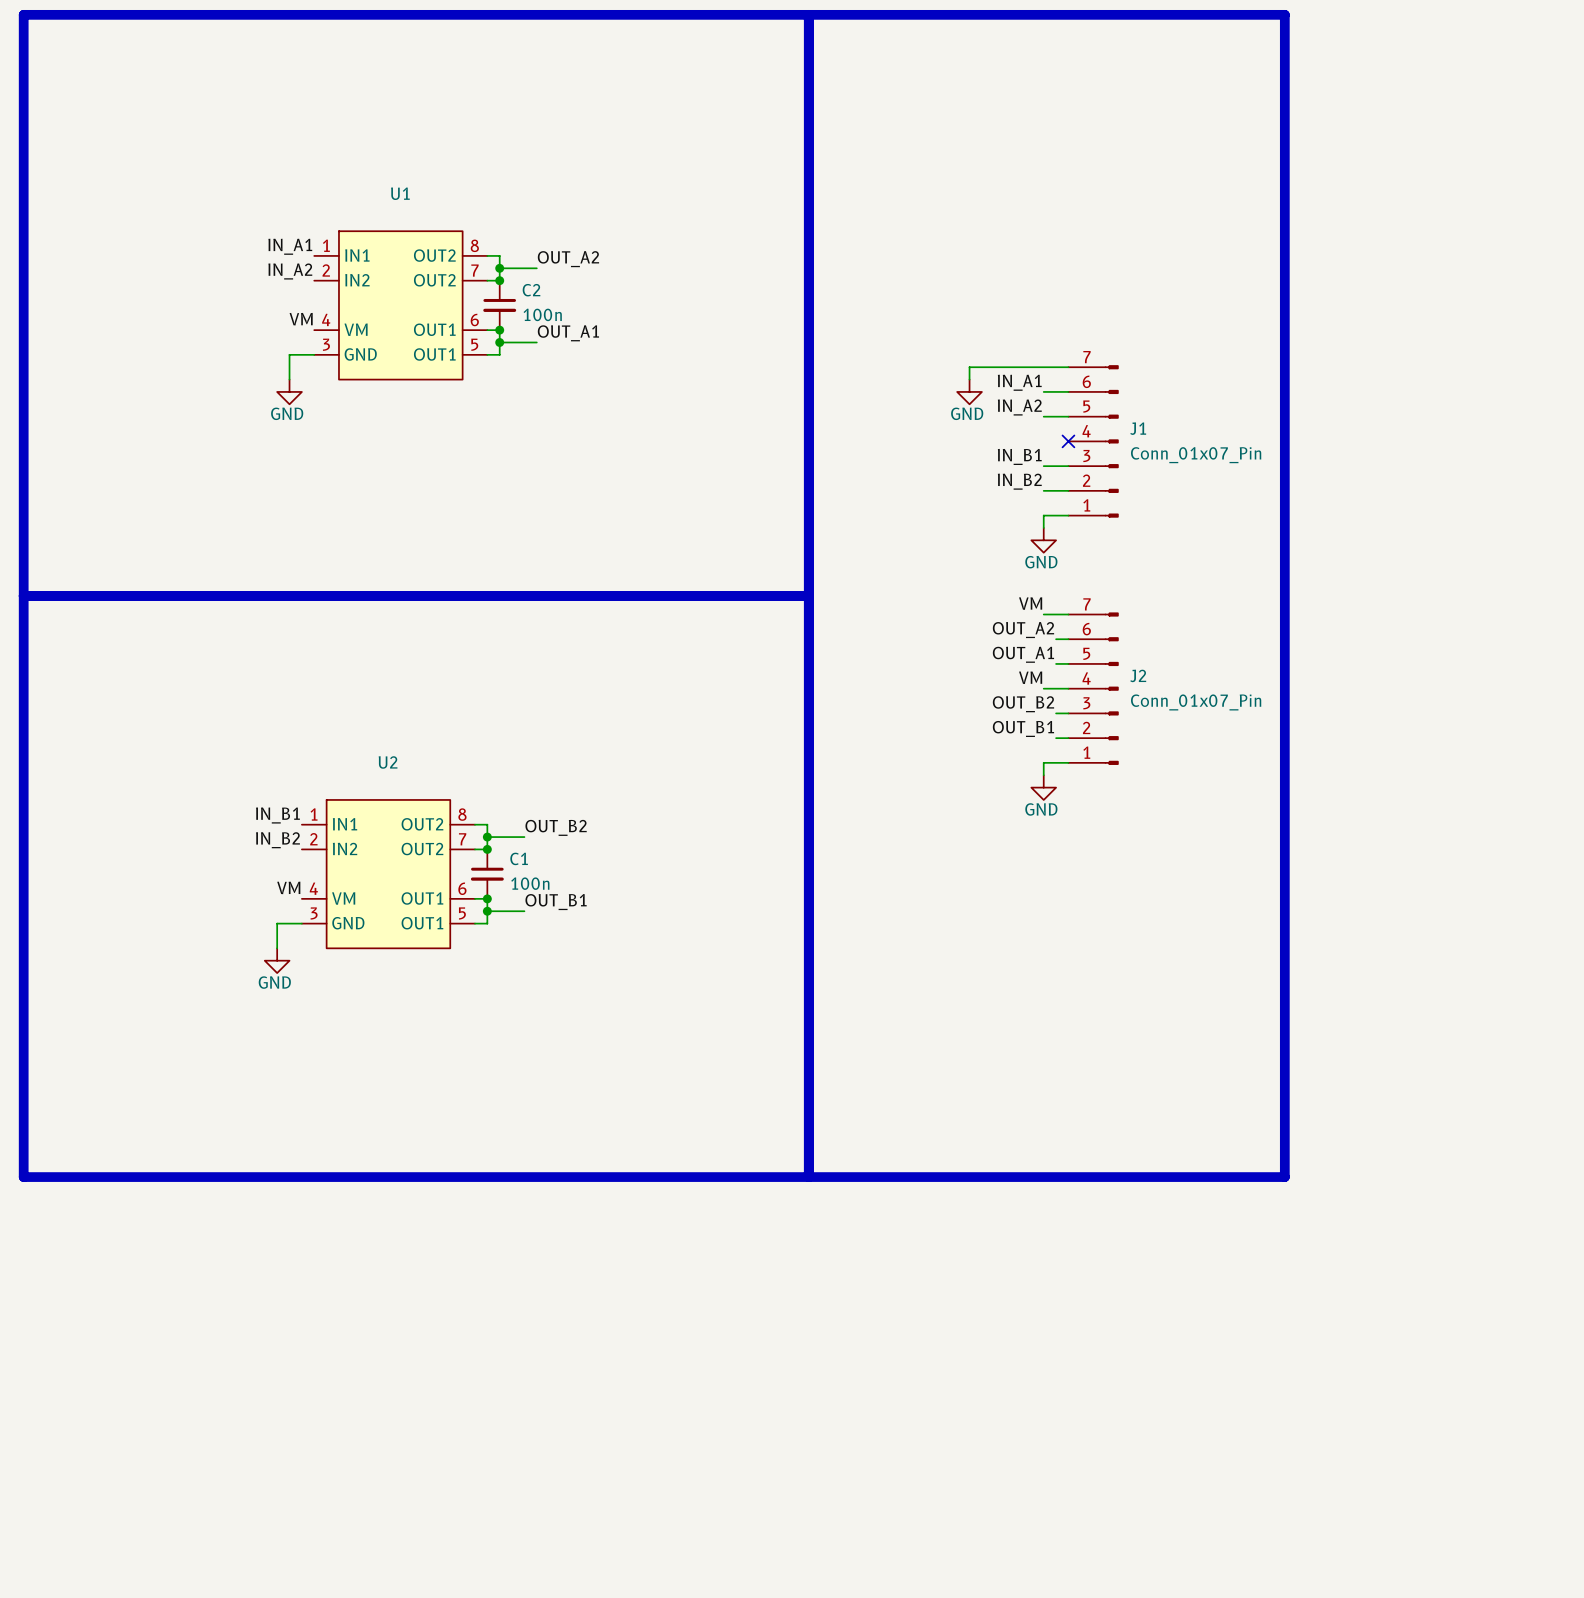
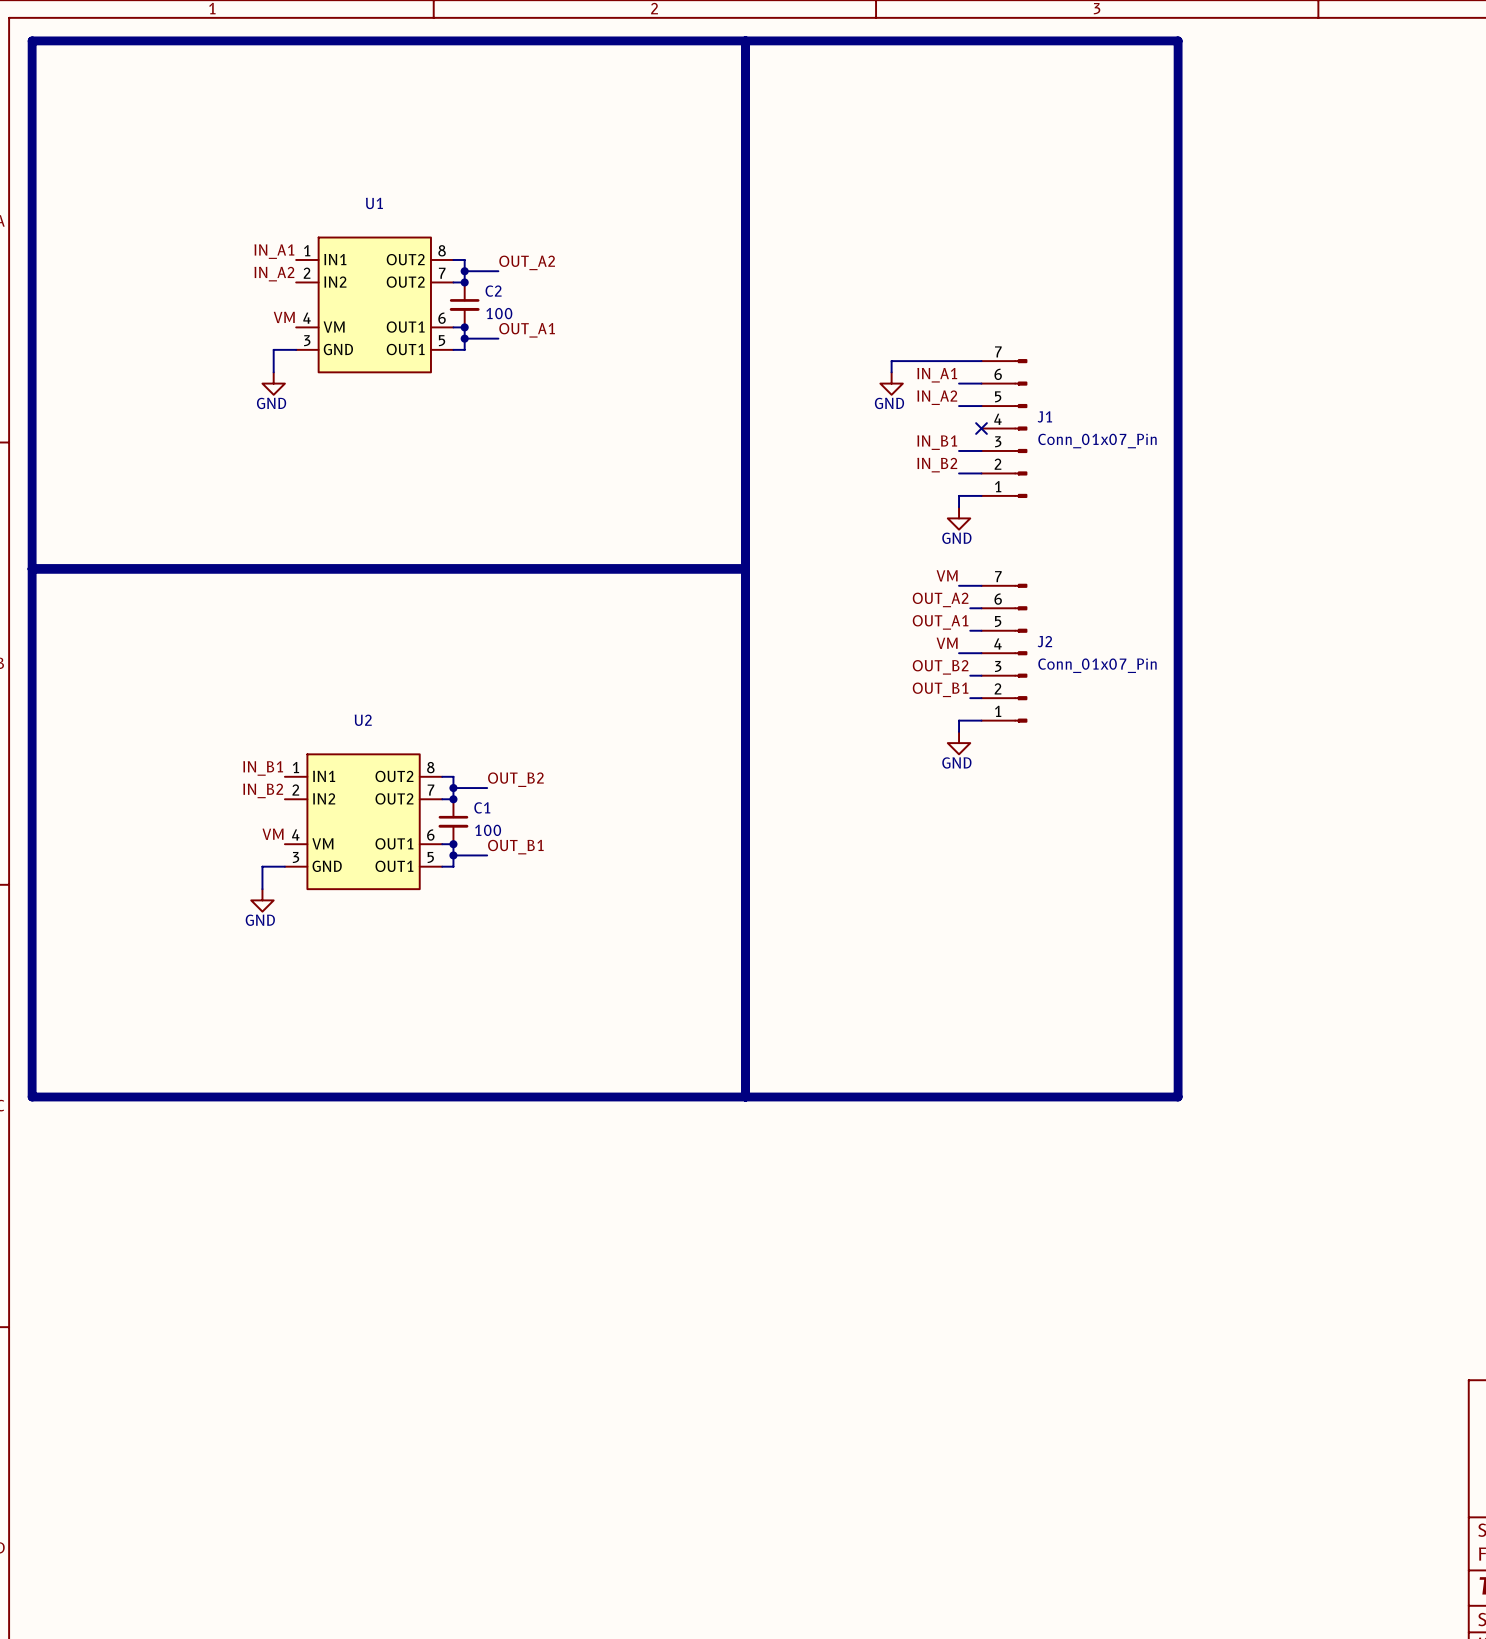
C2 value: 100n (542, 314) -> 100 (499, 313)
C1 value: 100n (530, 883) -> 100 (488, 830)

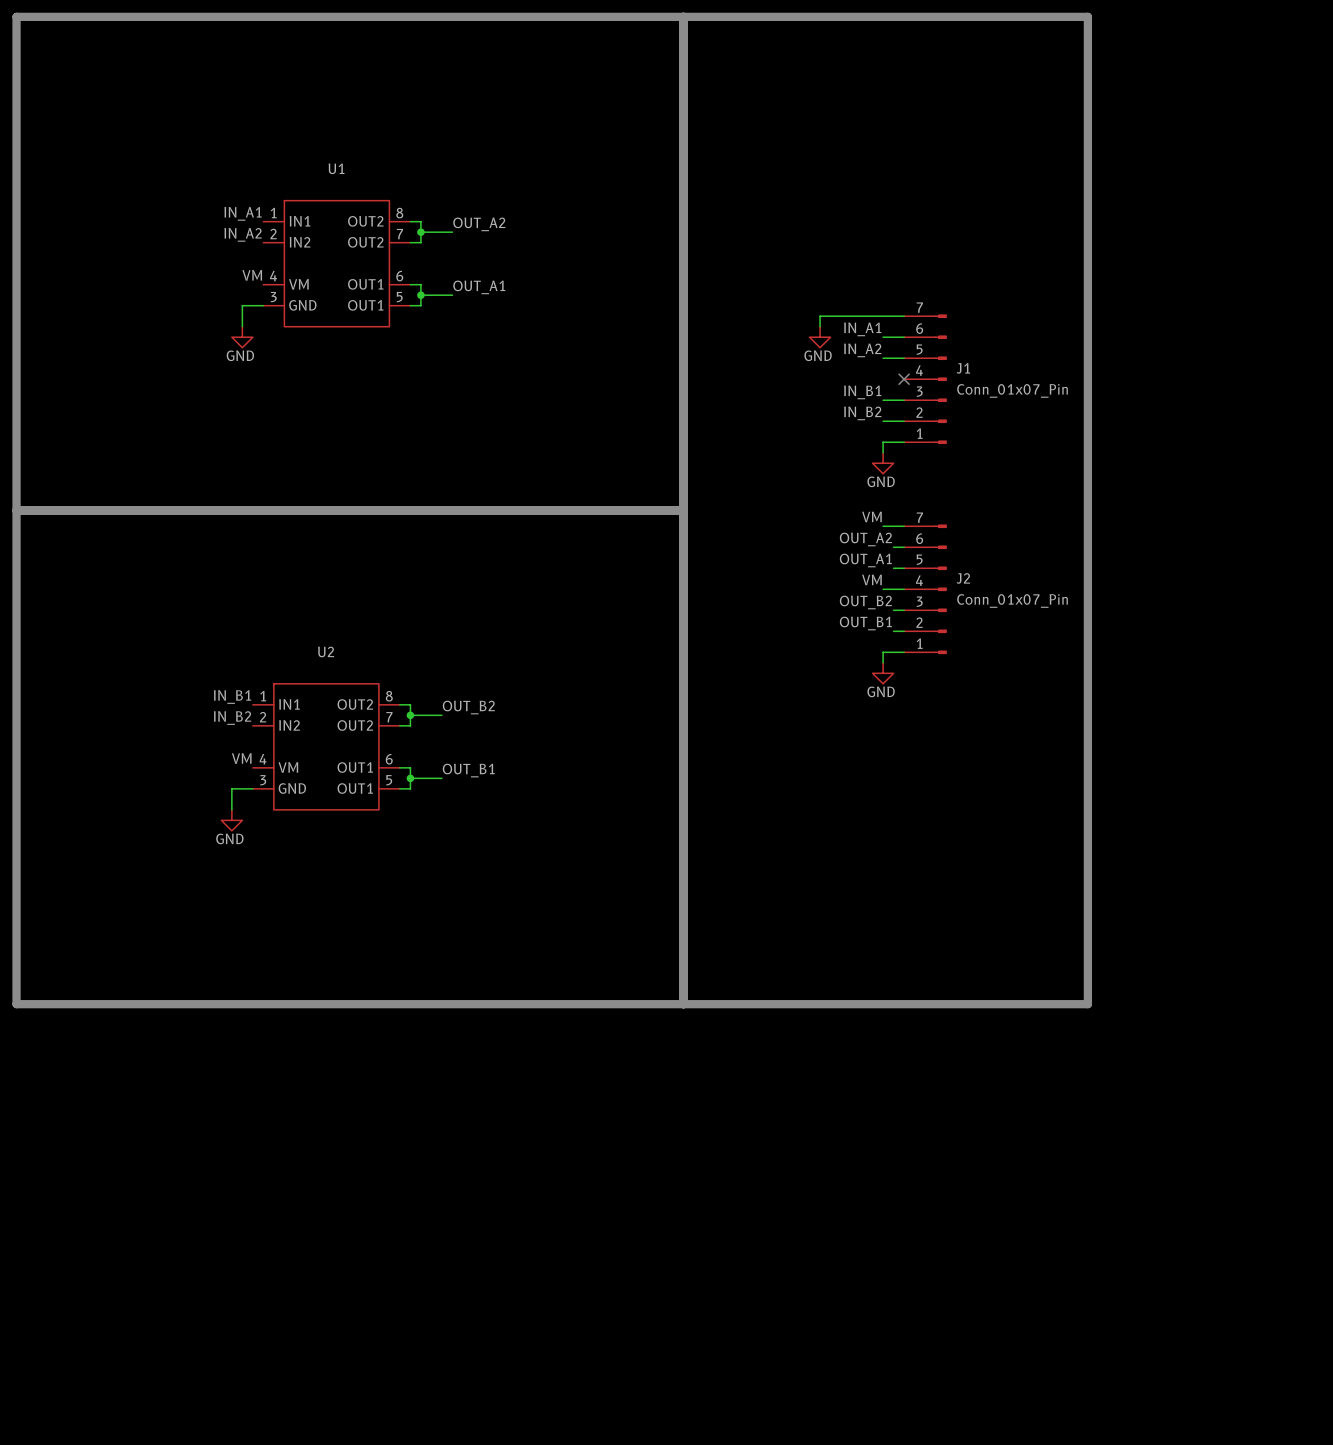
junction: (464, 282) -> none
C2: 100 (464, 304) -> none
junction: (464, 327) -> none
junction: (453, 799) -> none
C1: 100 (453, 821) -> none
junction: (453, 844) -> none

